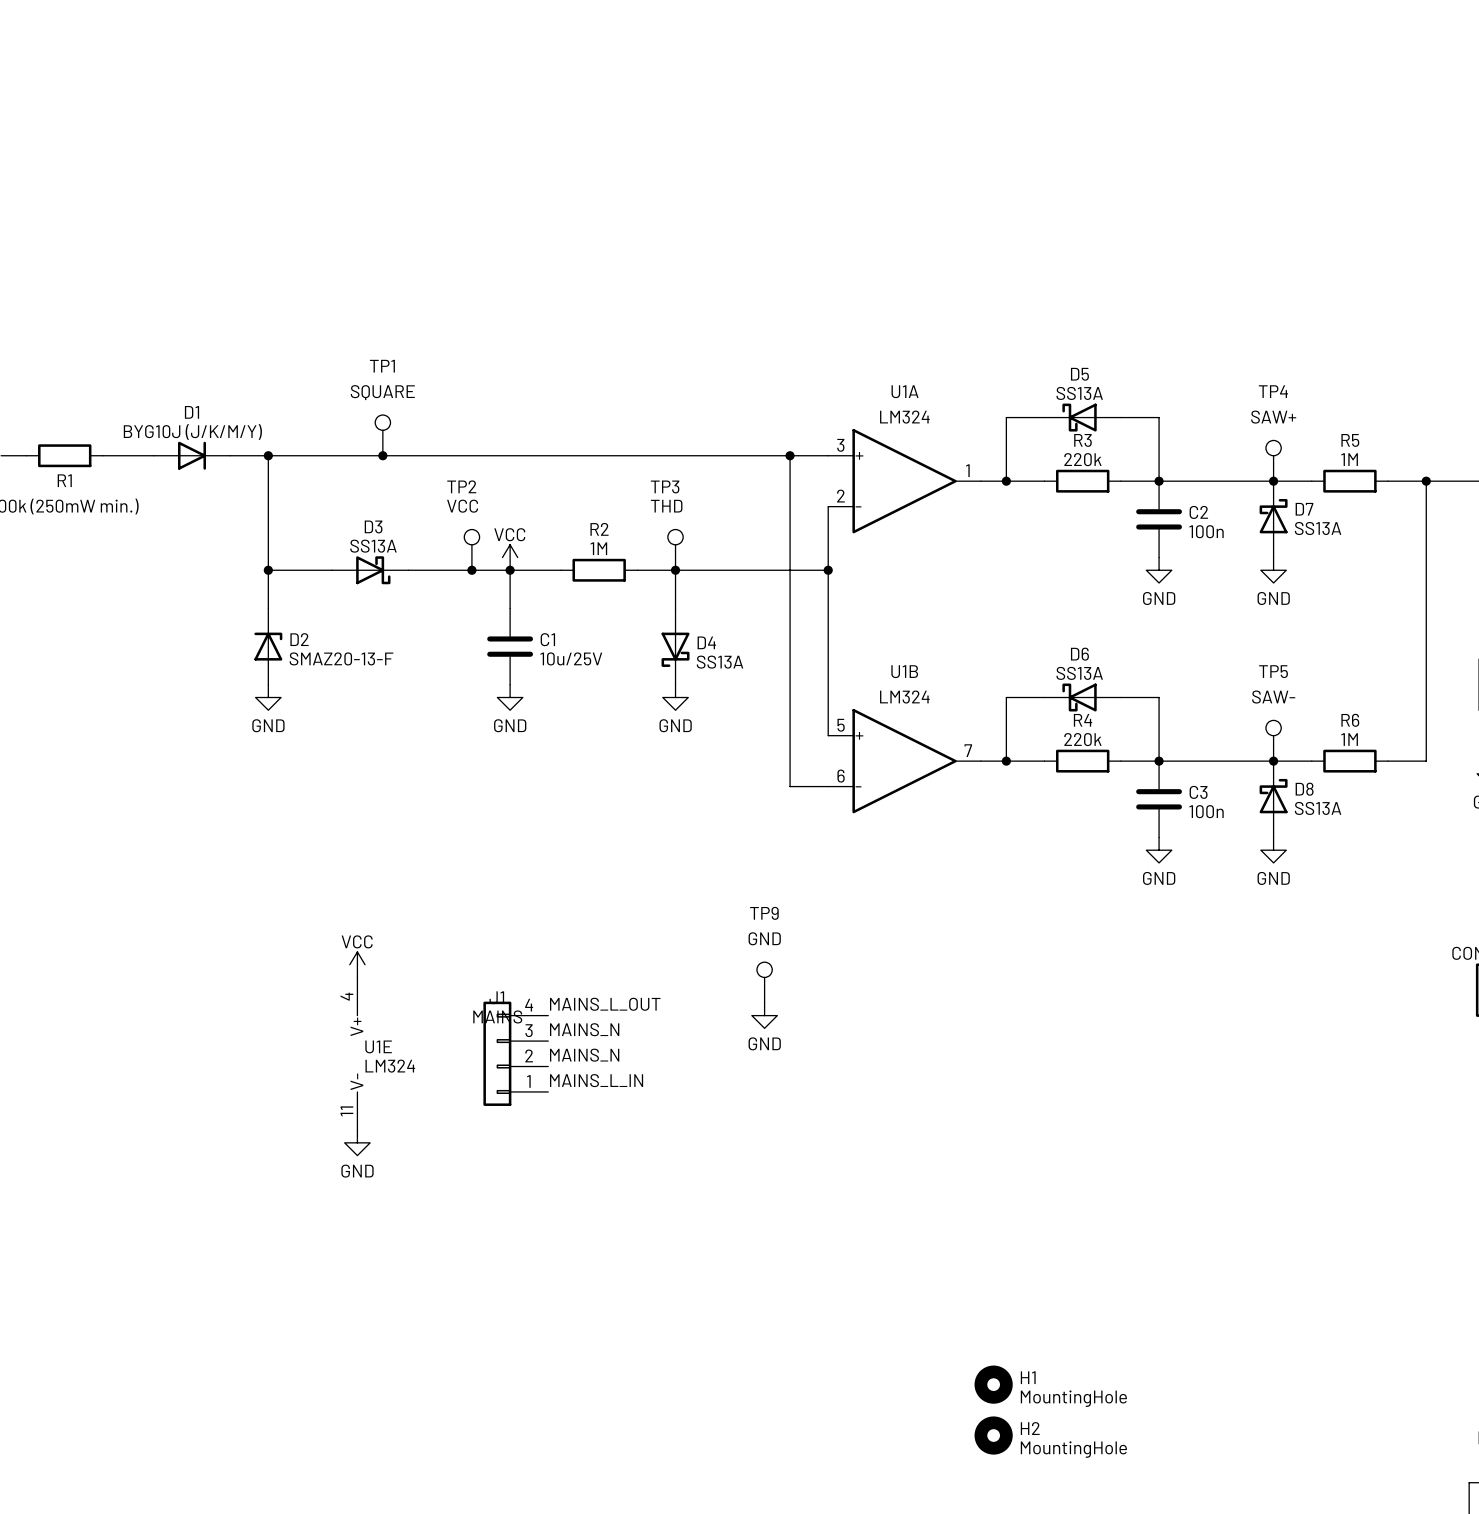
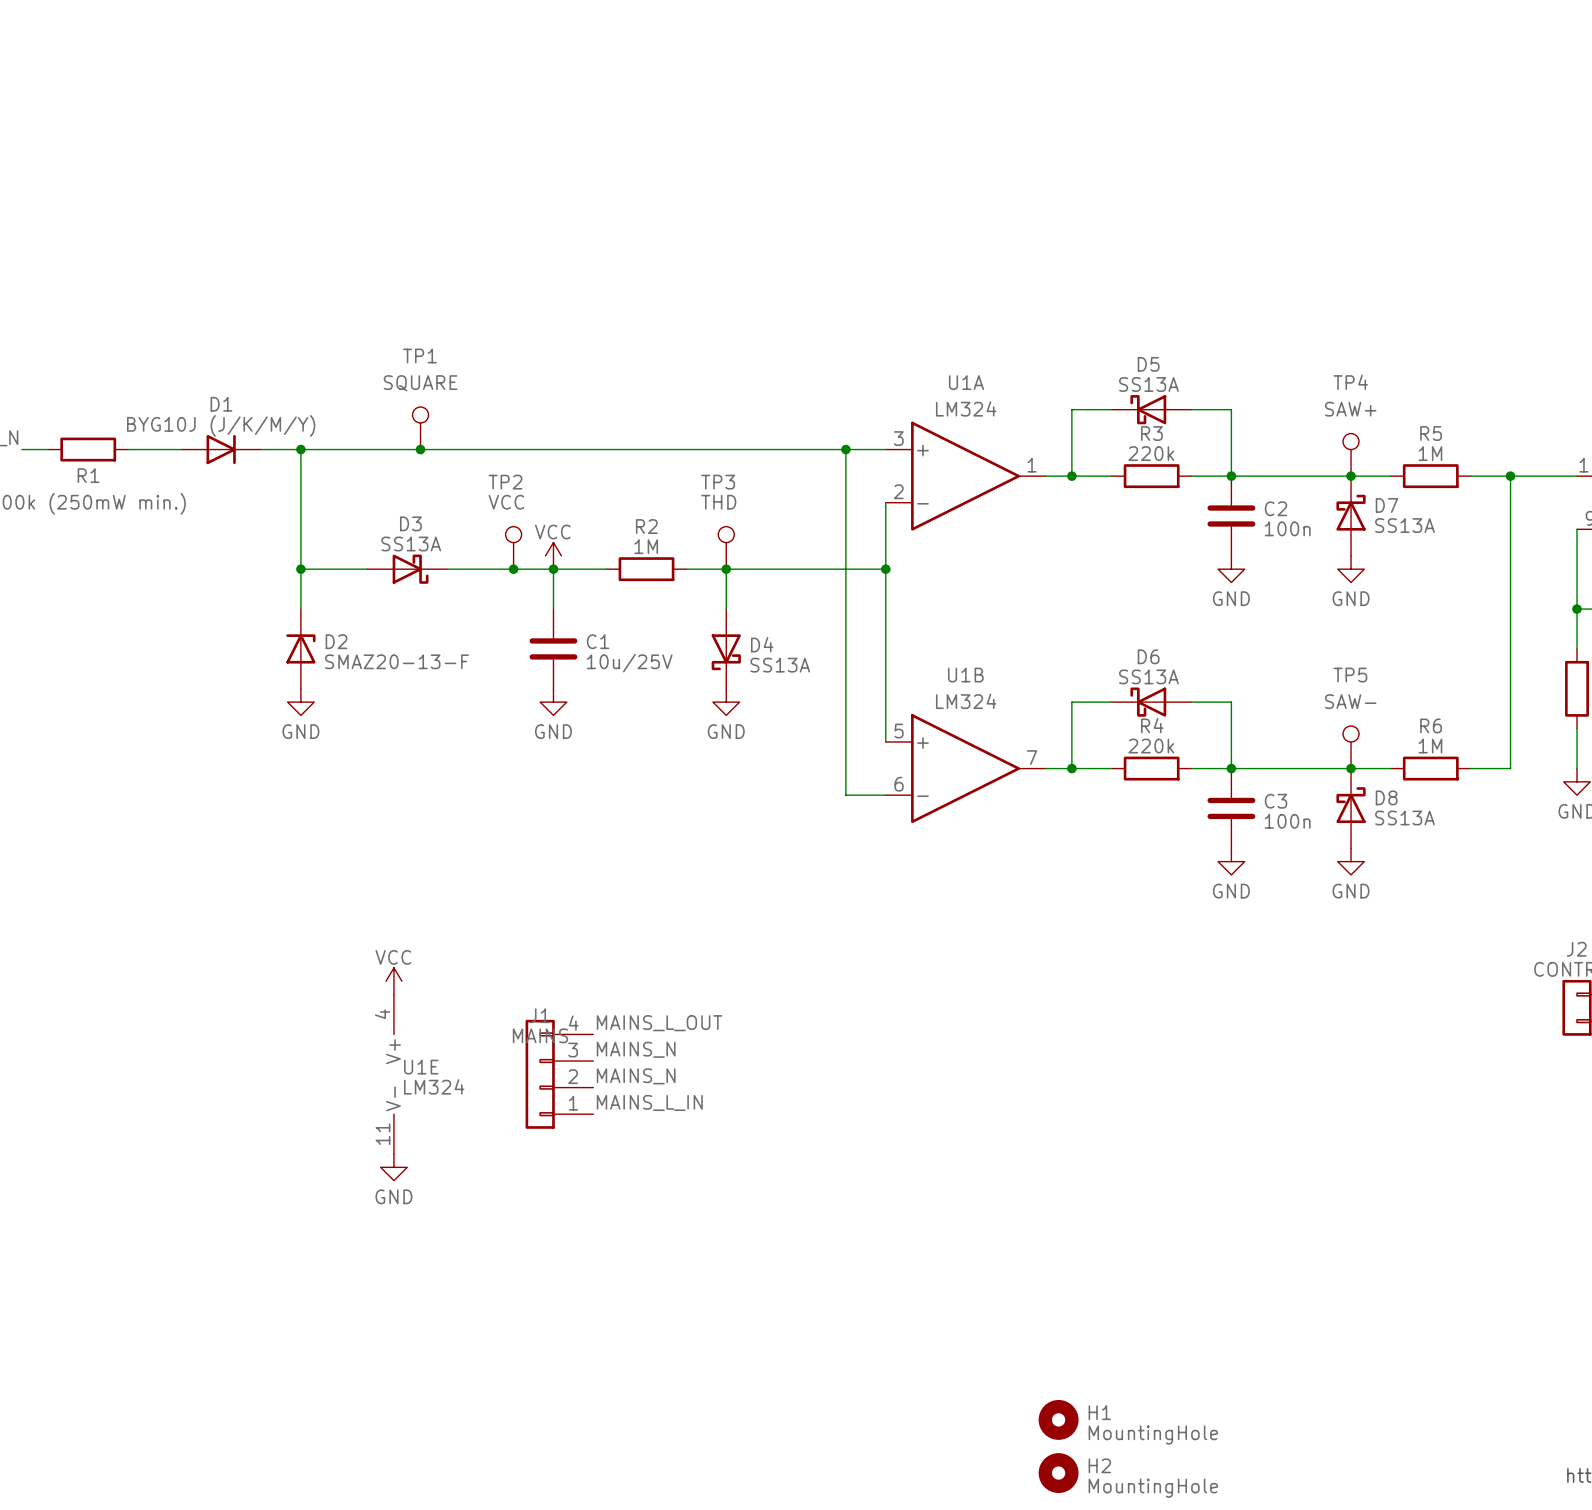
TP9: GND (764, 982) -> none
power symbol: GND (764, 1015) -> none

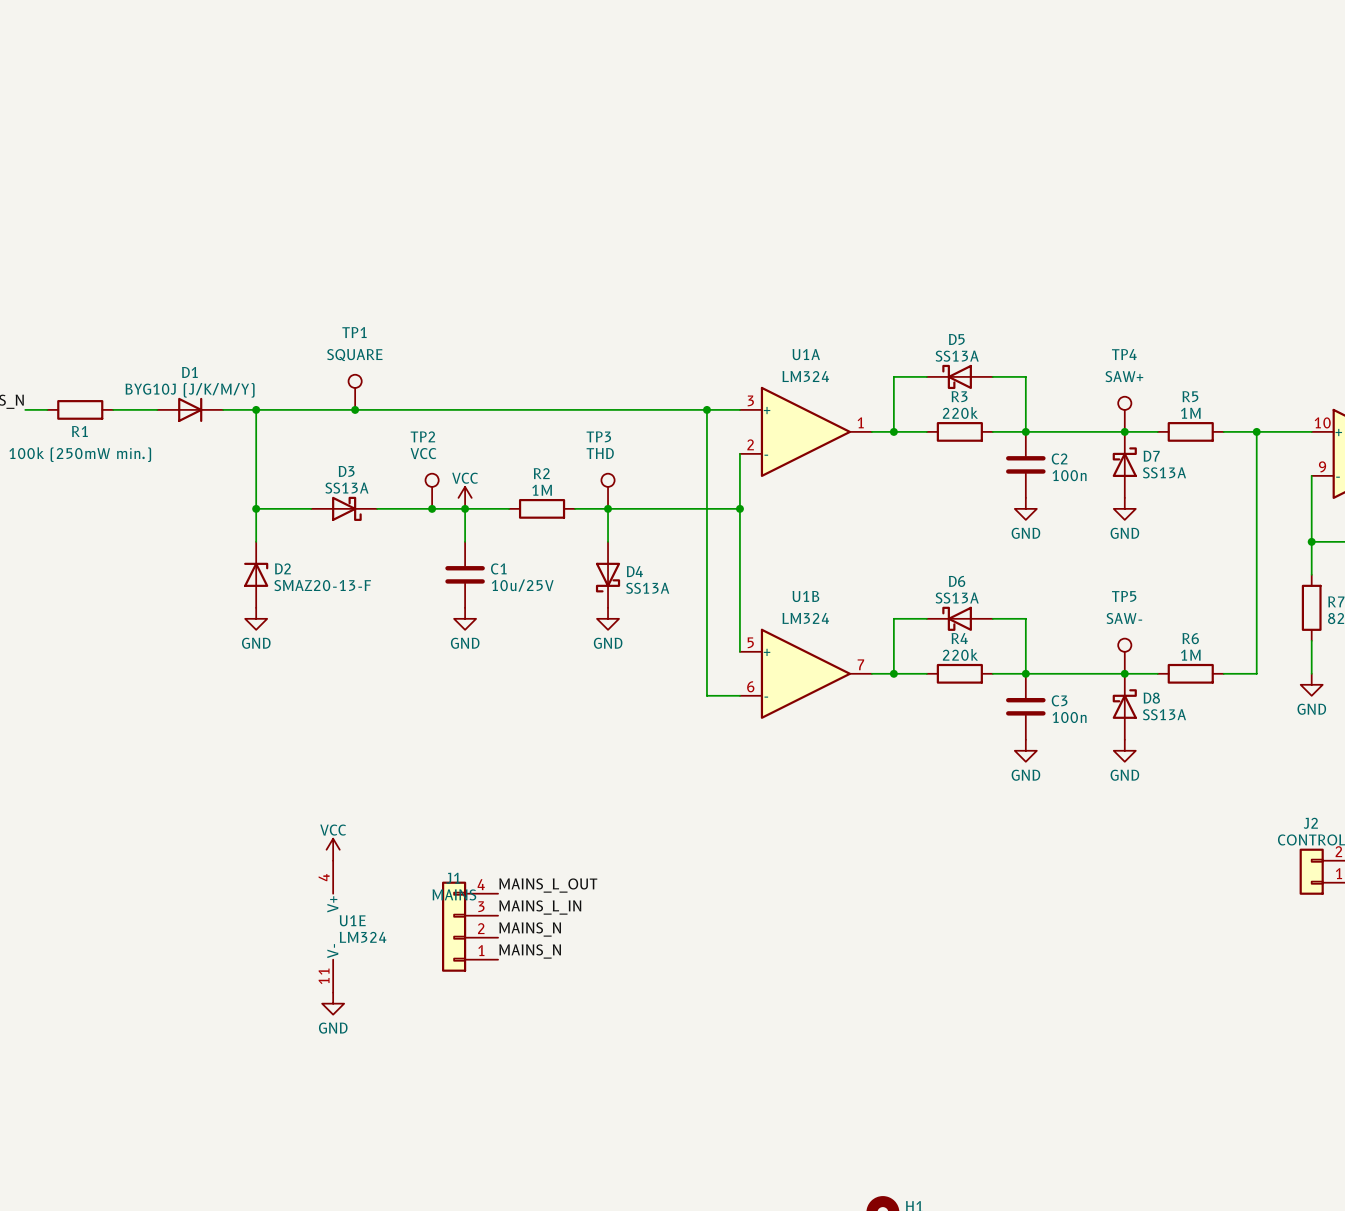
label: MAINS_N (636, 1049) -> MAINS_L_IN (540, 907)
label: MAINS_L_IN (649, 1102) -> MAINS_N (530, 951)

